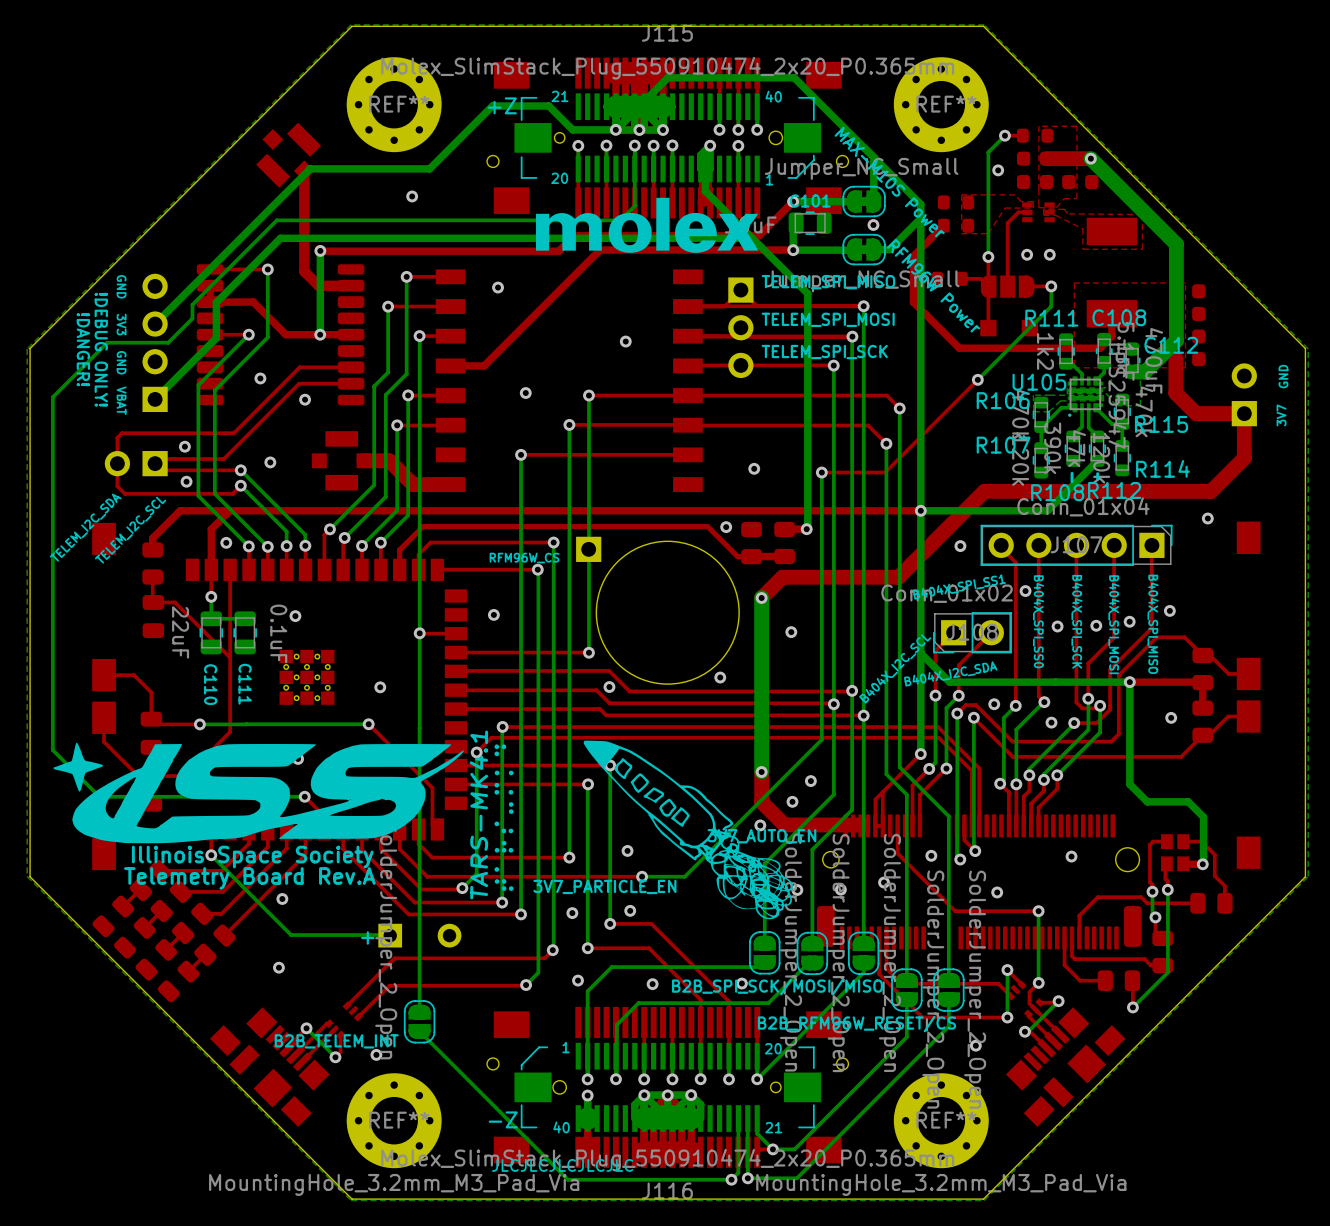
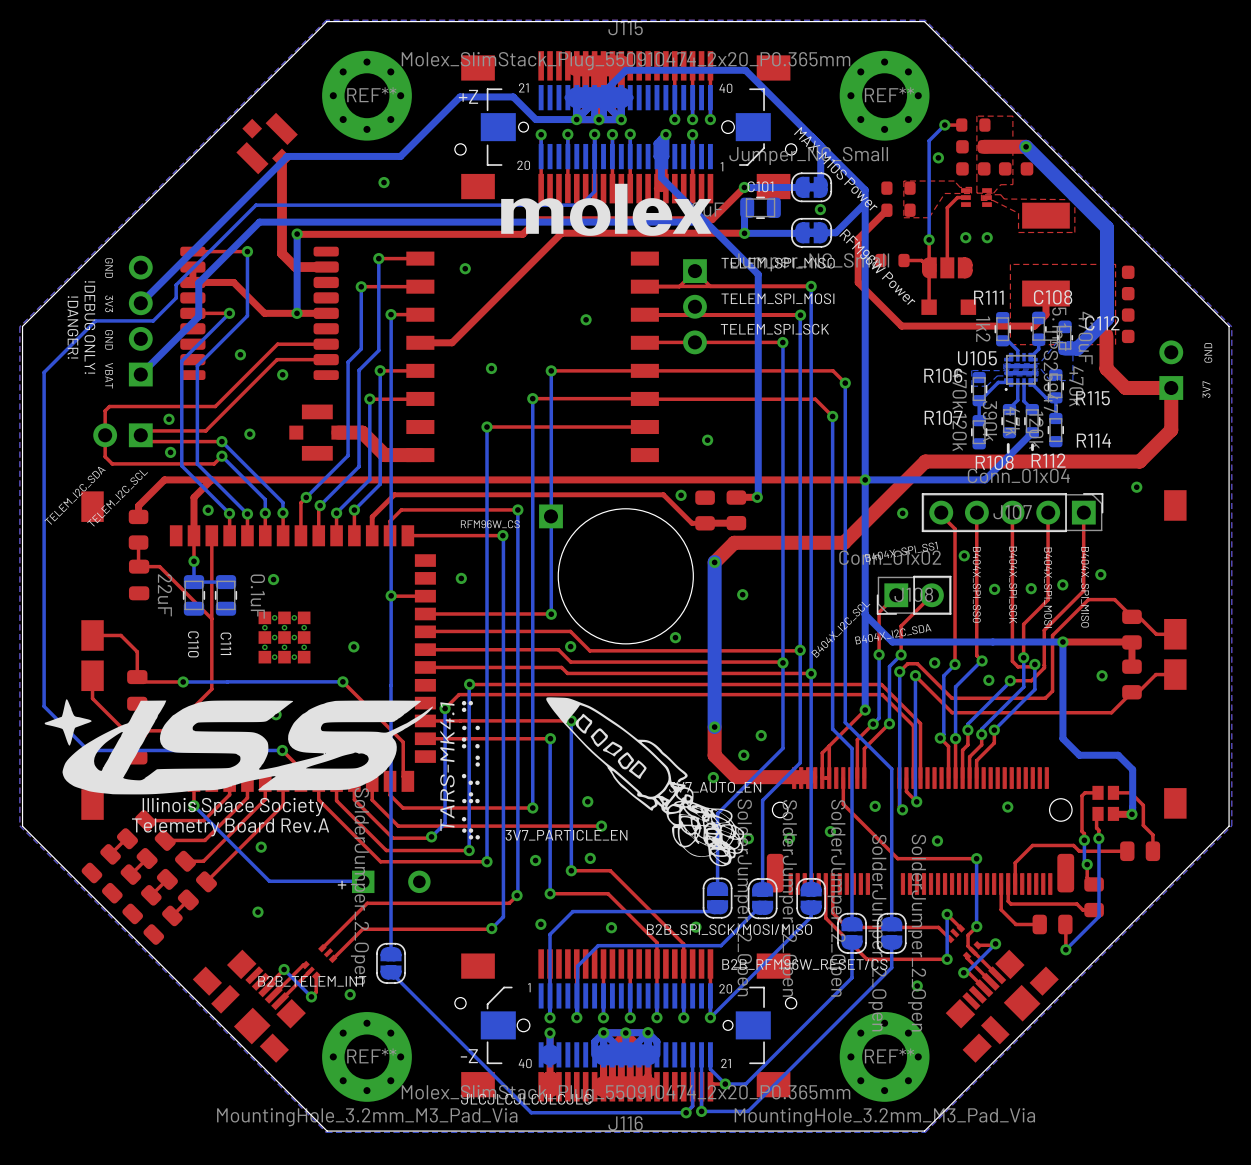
top track: (1051, 286) (1026, 286) -> none
via: (1051, 286) -> none
bottom track: (1051, 287) (1051, 306) (977, 379) -> none
top track: (977, 379) (885, 472) (821, 472) -> none
via: (977, 379) -> none
bottom track: (821, 472) (821, 739) (684, 876) (642, 876) -> none
via: (821, 472) -> none

